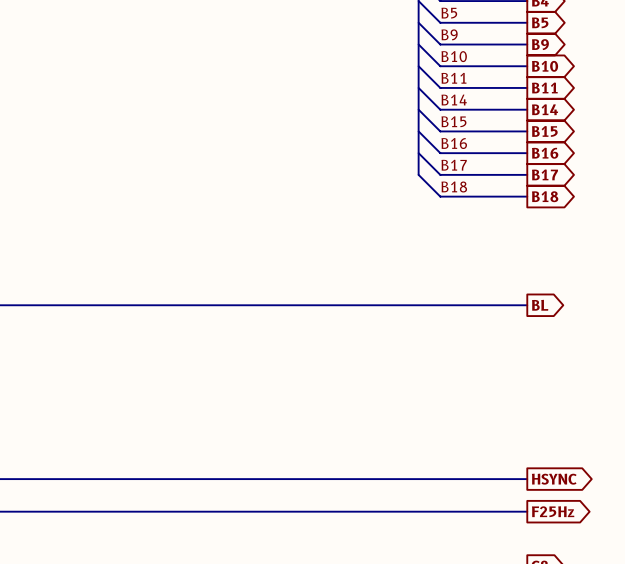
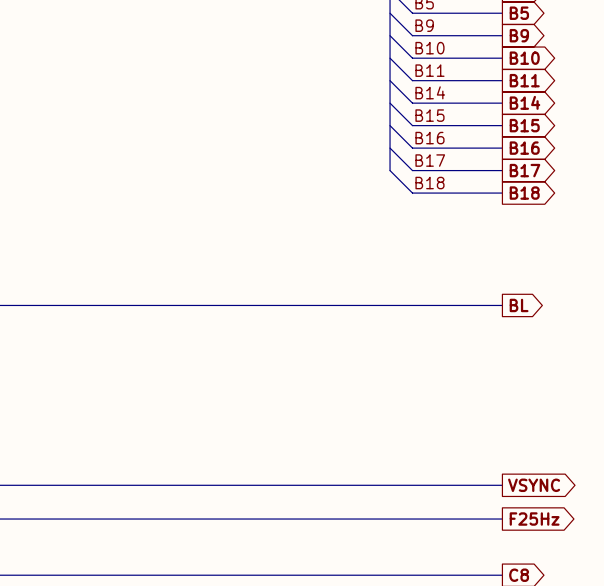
global label: HSYNC (554, 479) -> VSYNC (534, 485)

